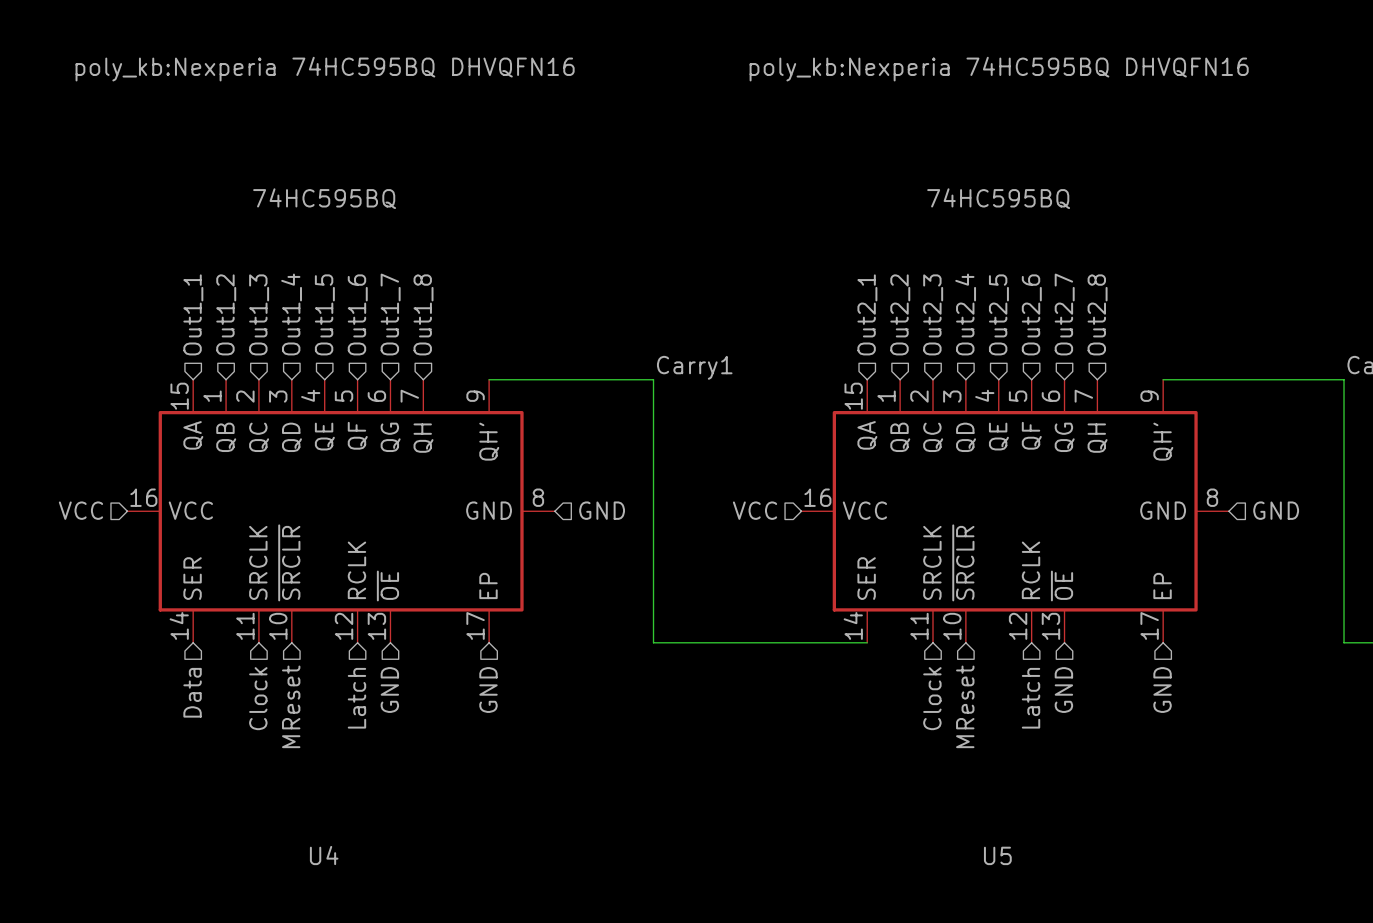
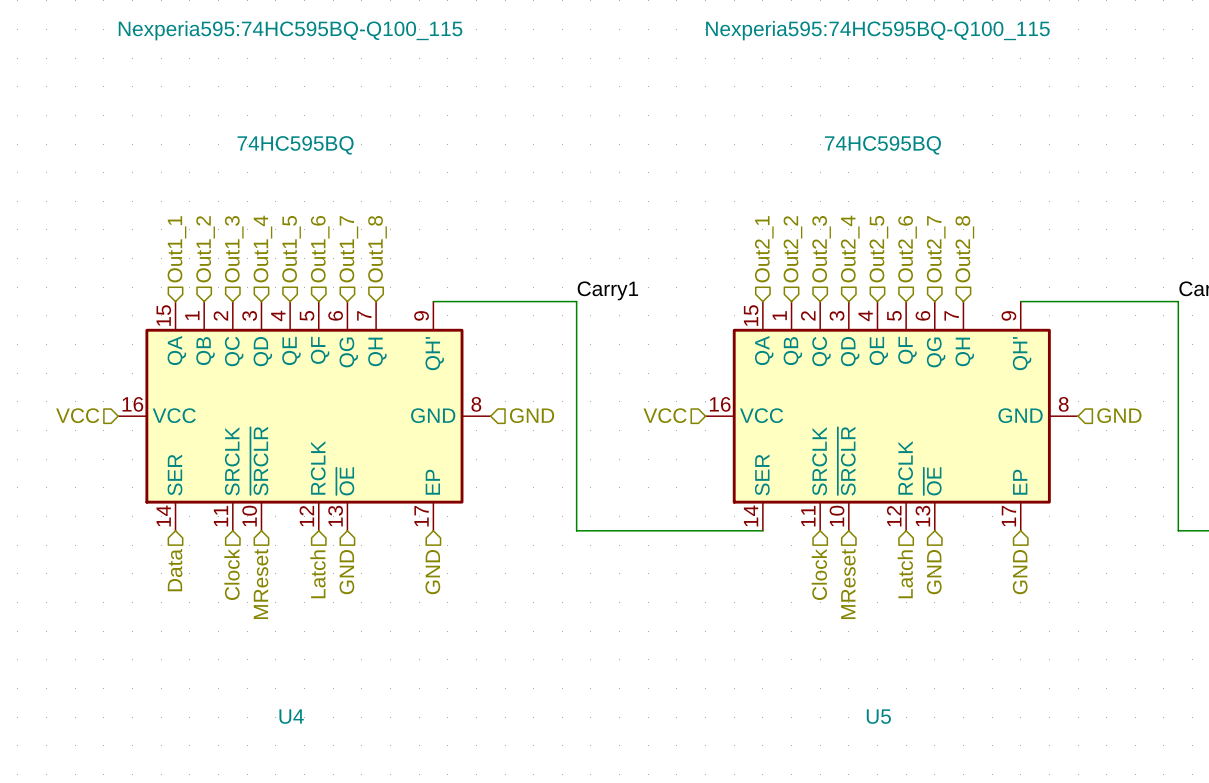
U4 text: poly_kb:Nexperia 74HC595BQ DHVQFN16 (325, 69) -> Nexperia595:74HC595BQ-Q100_115 (290, 30)
U5 text: poly_kb:Nexperia 74HC595BQ DHVQFN16 (999, 69) -> Nexperia595:74HC595BQ-Q100_115 (877, 30)

